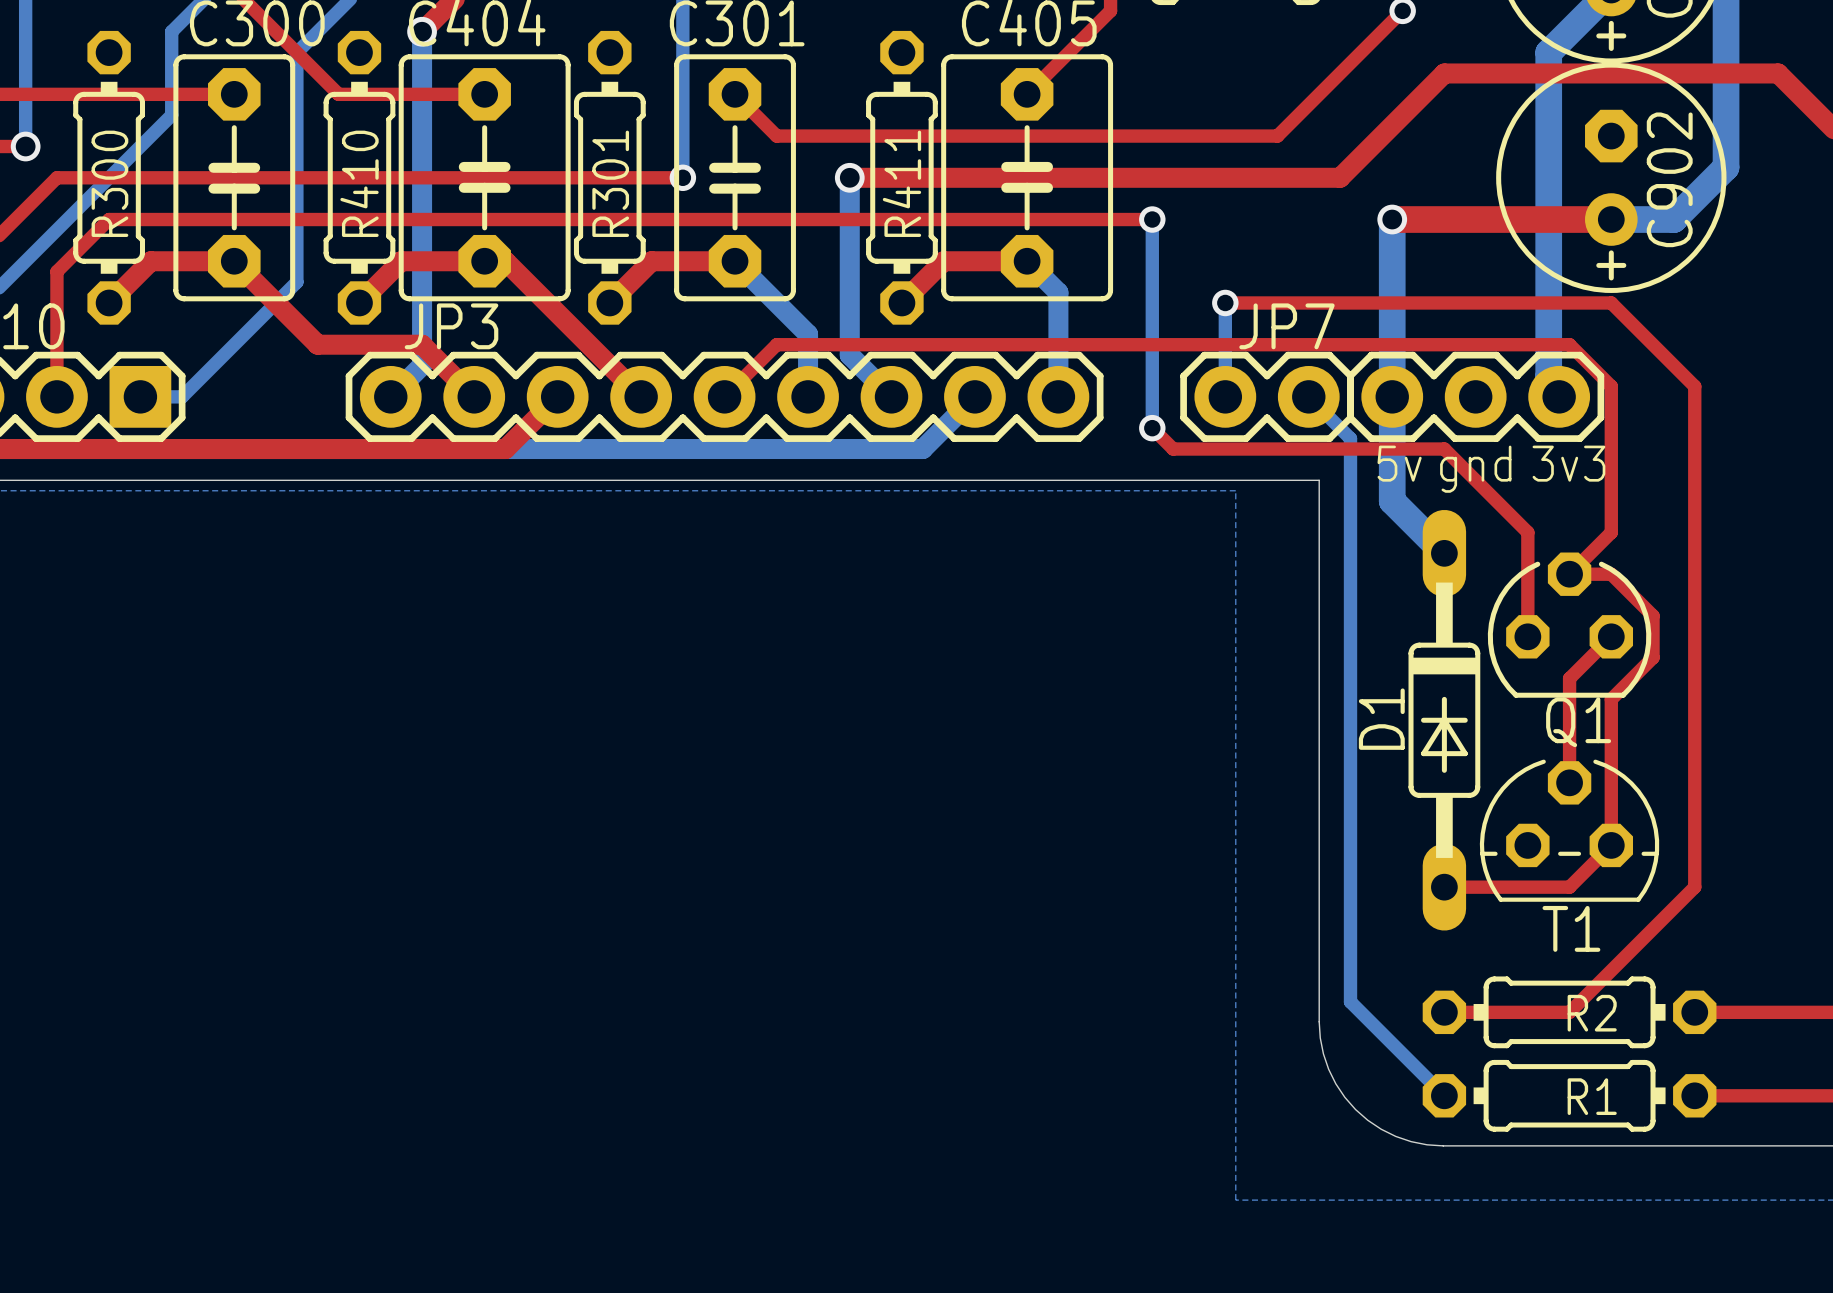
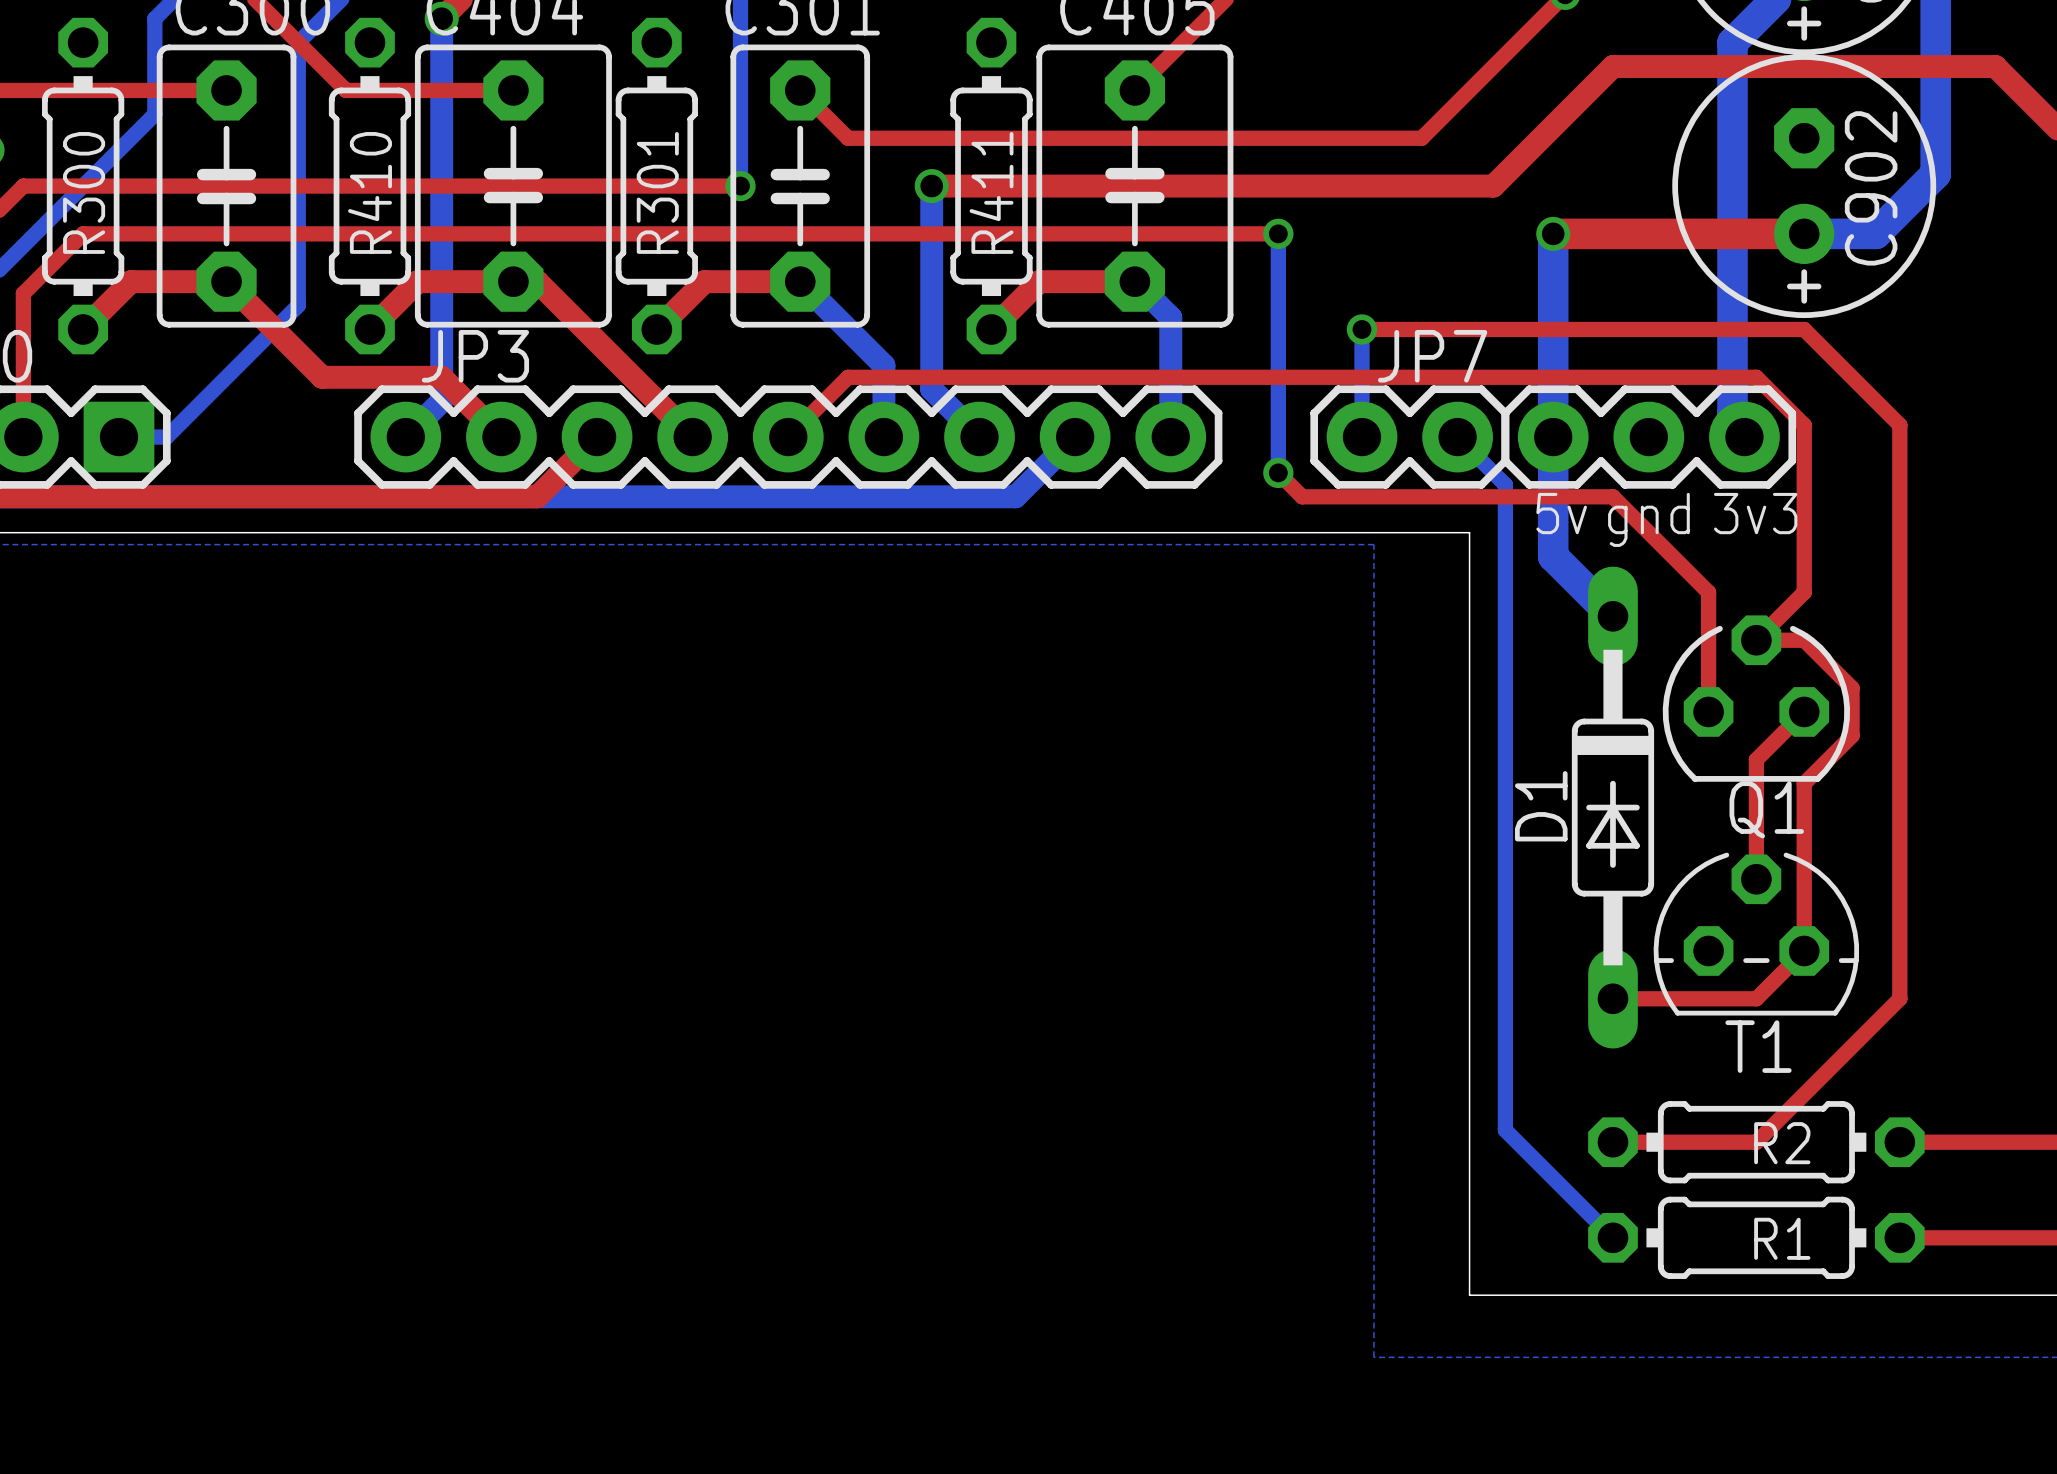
board edge: (1319, 1021) (1320, 1038) (1328, 1069) (1344, 1097) (1355, 1109) (1367, 1120) (1395, 1136) (1427, 1144) (1443, 1145) -> (1469, 1153) (1469, 1295) (1611, 1295)

